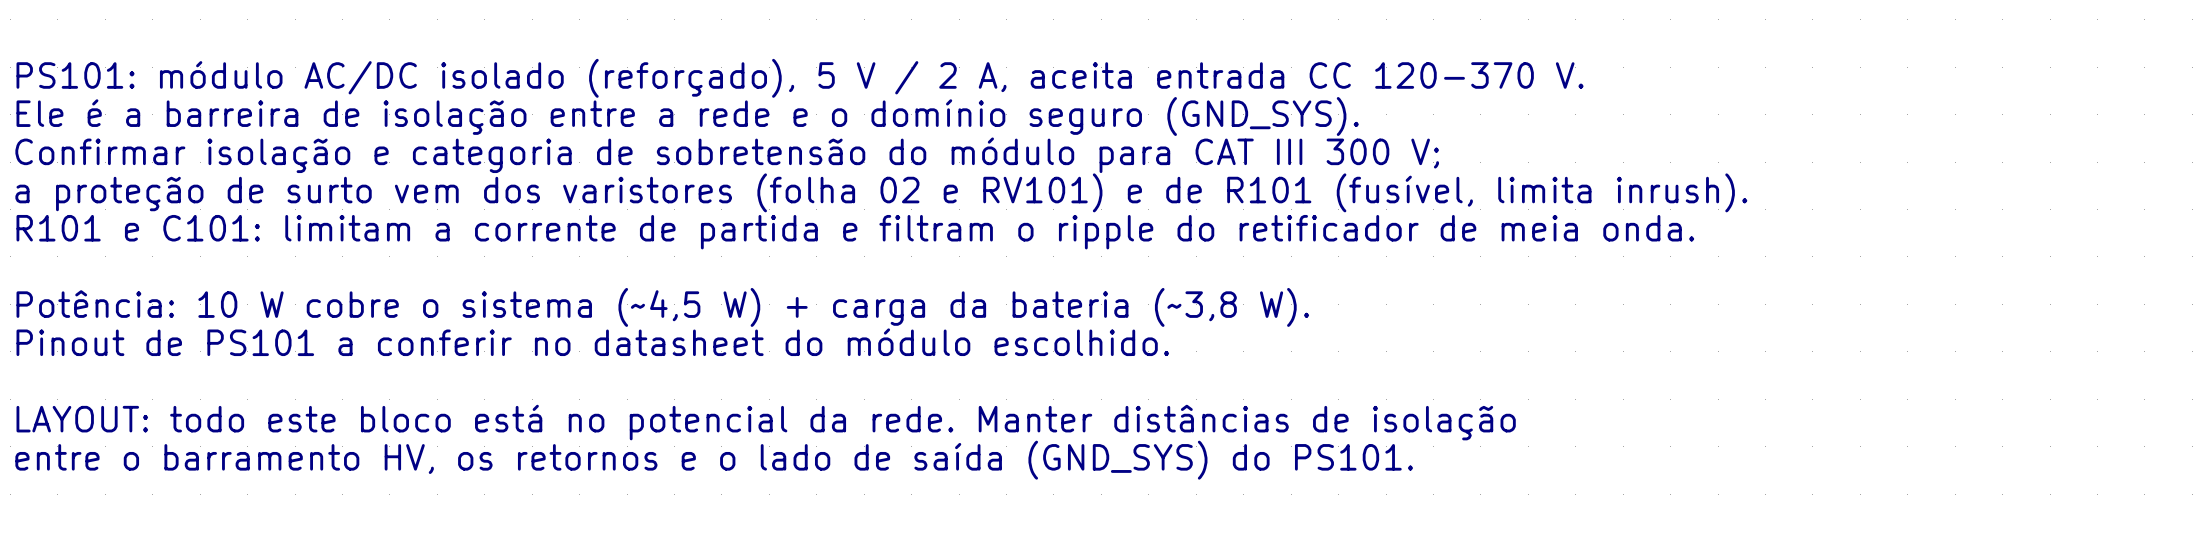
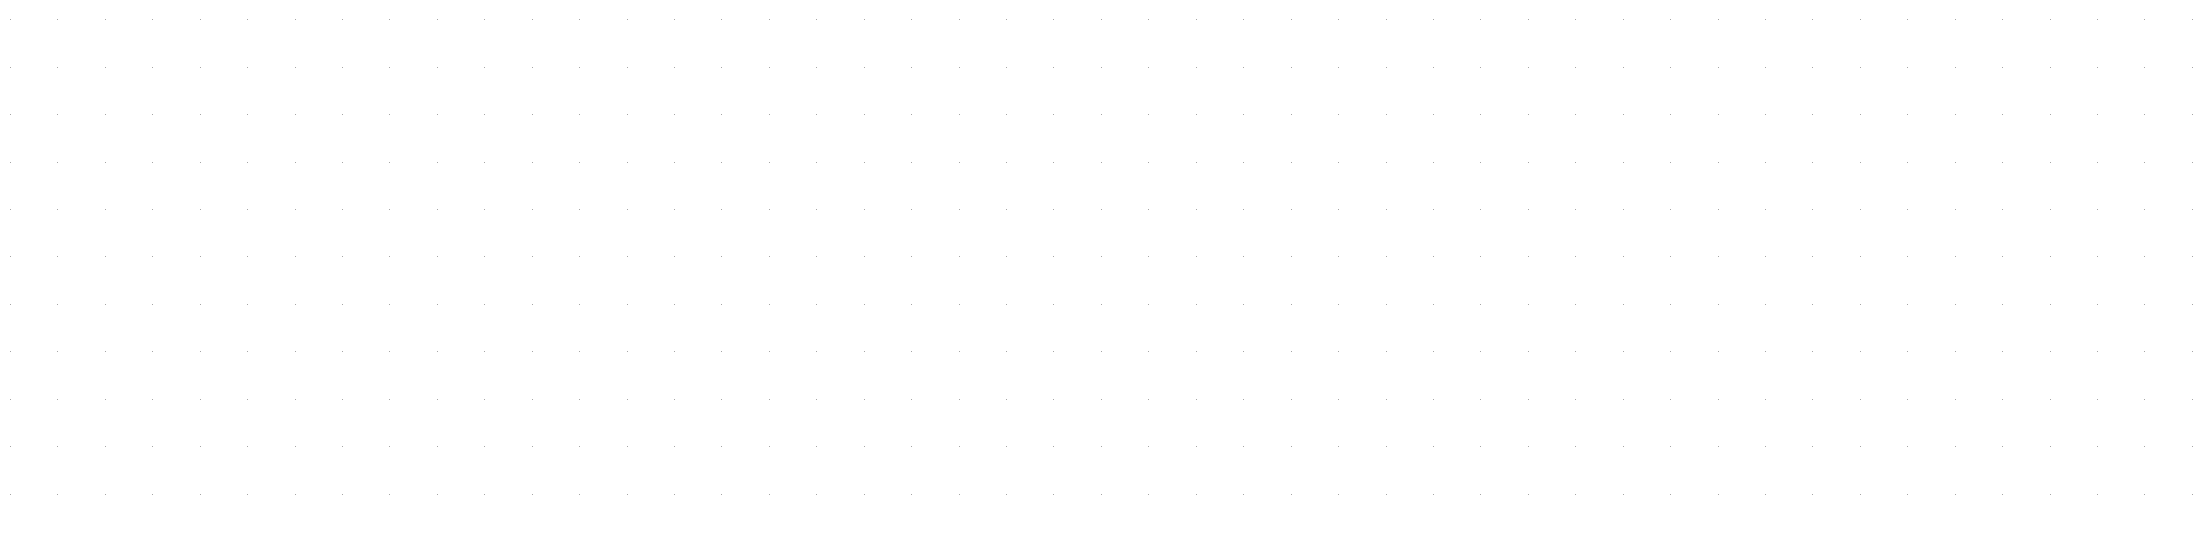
text: PS101: módulo AC/DC isolado (reforçado), 5 V / 2 A, aceita entrada CC 120-370 V. (800, 78) -> none
text: Ele é a barreira de isolação entre a rede e o domínio seguro (GND_SYS). (687, 116) -> none
text: Confirmar isolação e categoria de sobretensão do módulo para CAT III 300 V; (727, 155) -> none
text: a proteção de surto vem dos varistores (folha 02 e RV101) e de R101 (fusível, limita inrush). (881, 192) -> none
text: R101 e C101: limitam a corrente de partida e filtram o ripple do retificador de meia onda. (855, 232) -> none
text: Potência: 10 W cobre o sistema (~4,5 W) + carga da bateria (~3,8 W). (662, 307) -> none
text: Pinout de PS101 a conferir no datasheet do módulo escolhido. (592, 342) -> none
text: LAYOUT: todo este bloco está no potencial da rede. Manter distâncias de isolação (766, 422) -> none
text: entre o barramento HV, os retornos e o lado de saída (GND_SYS) do PS101. (714, 460) -> none

